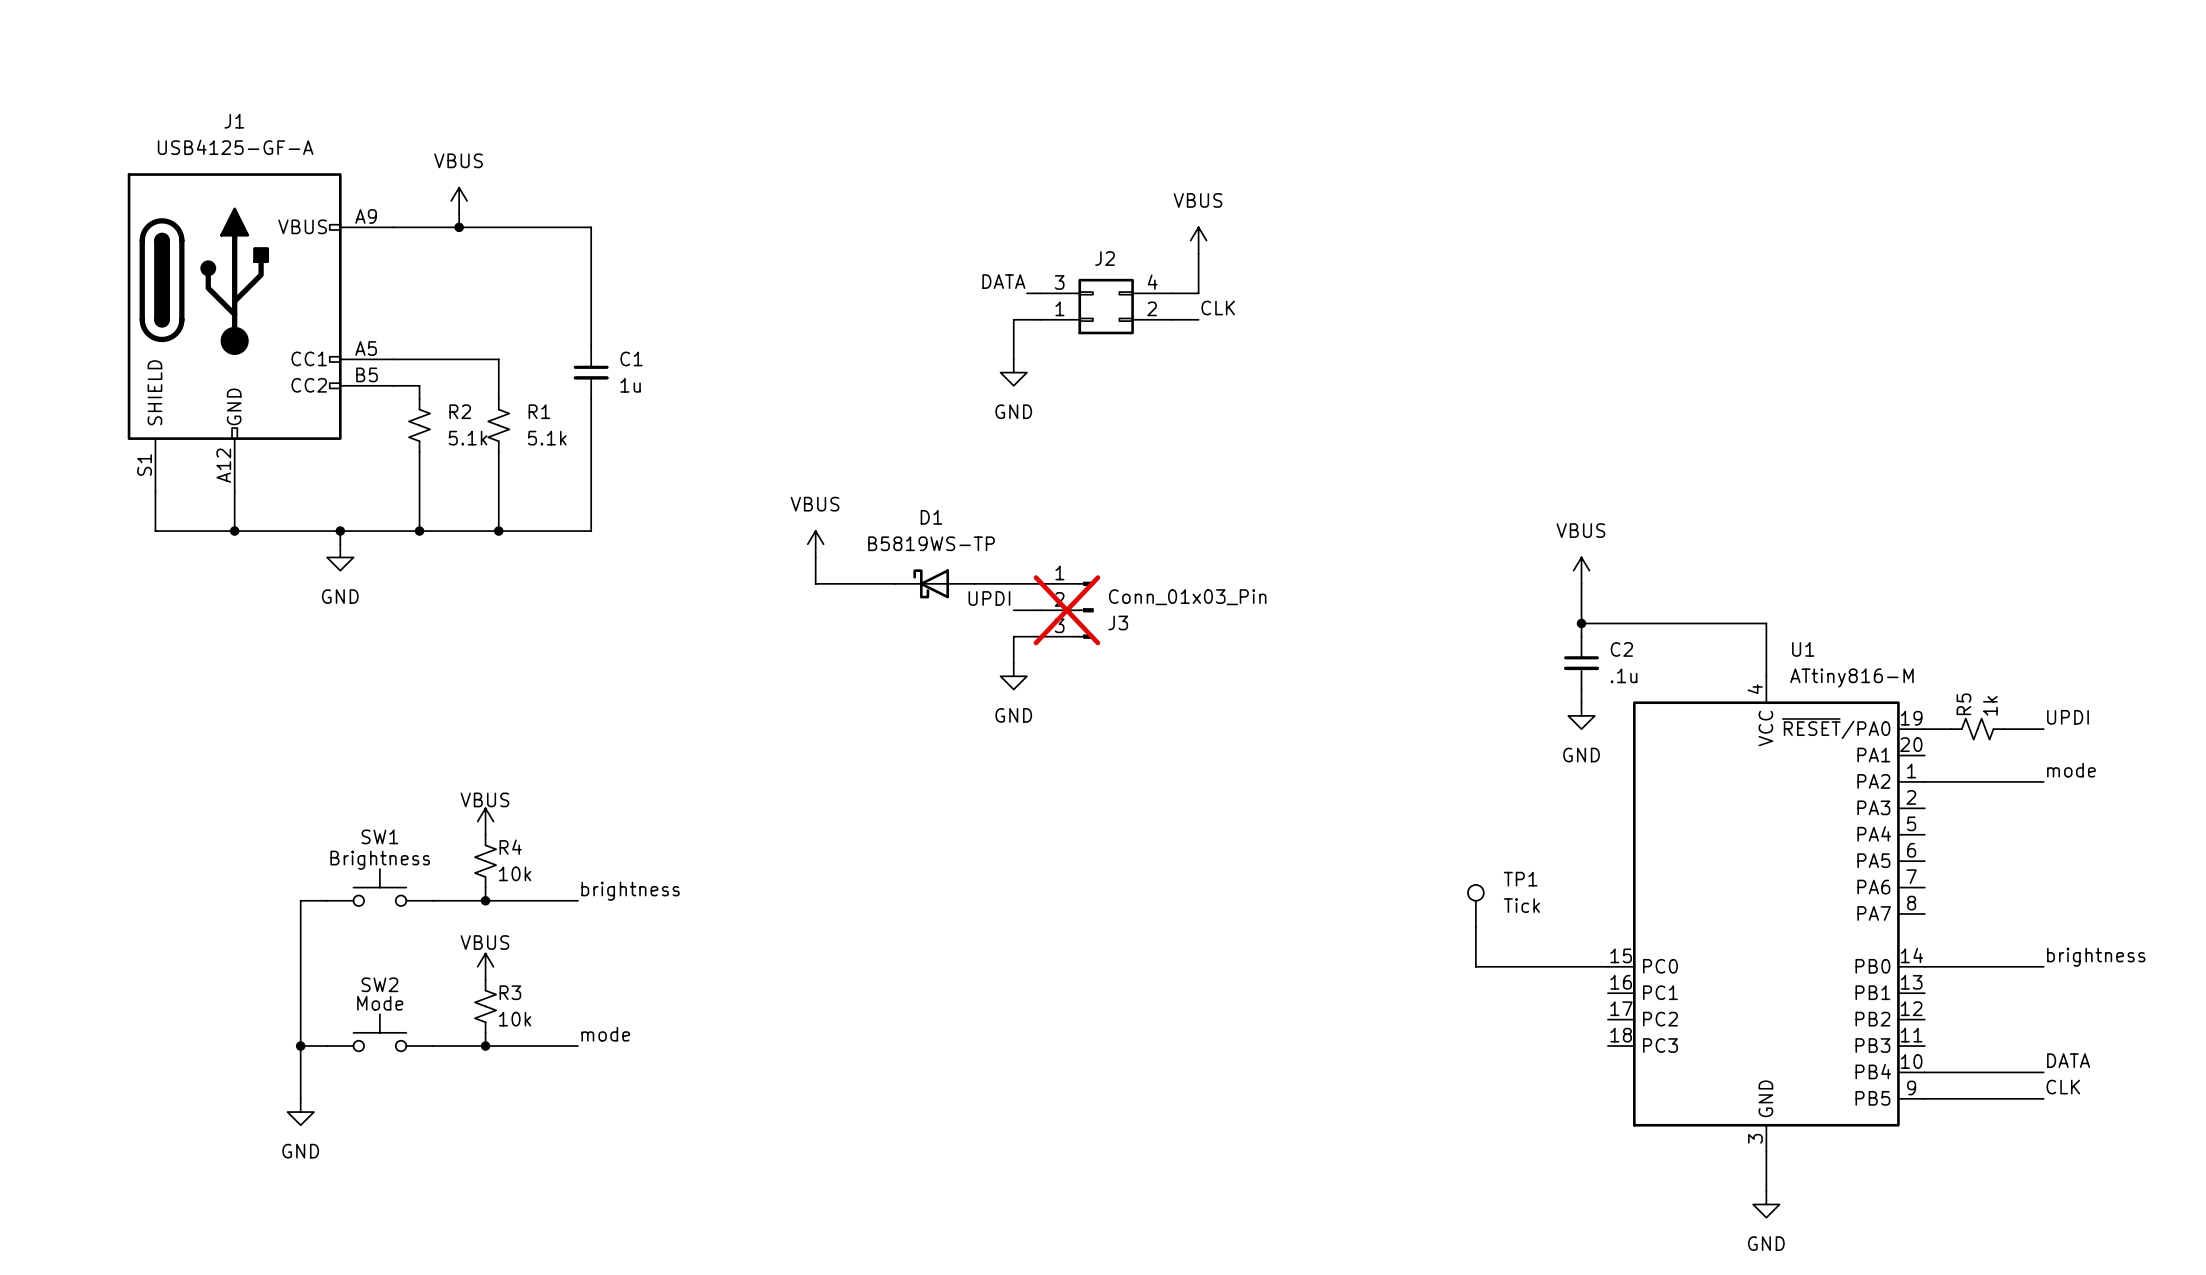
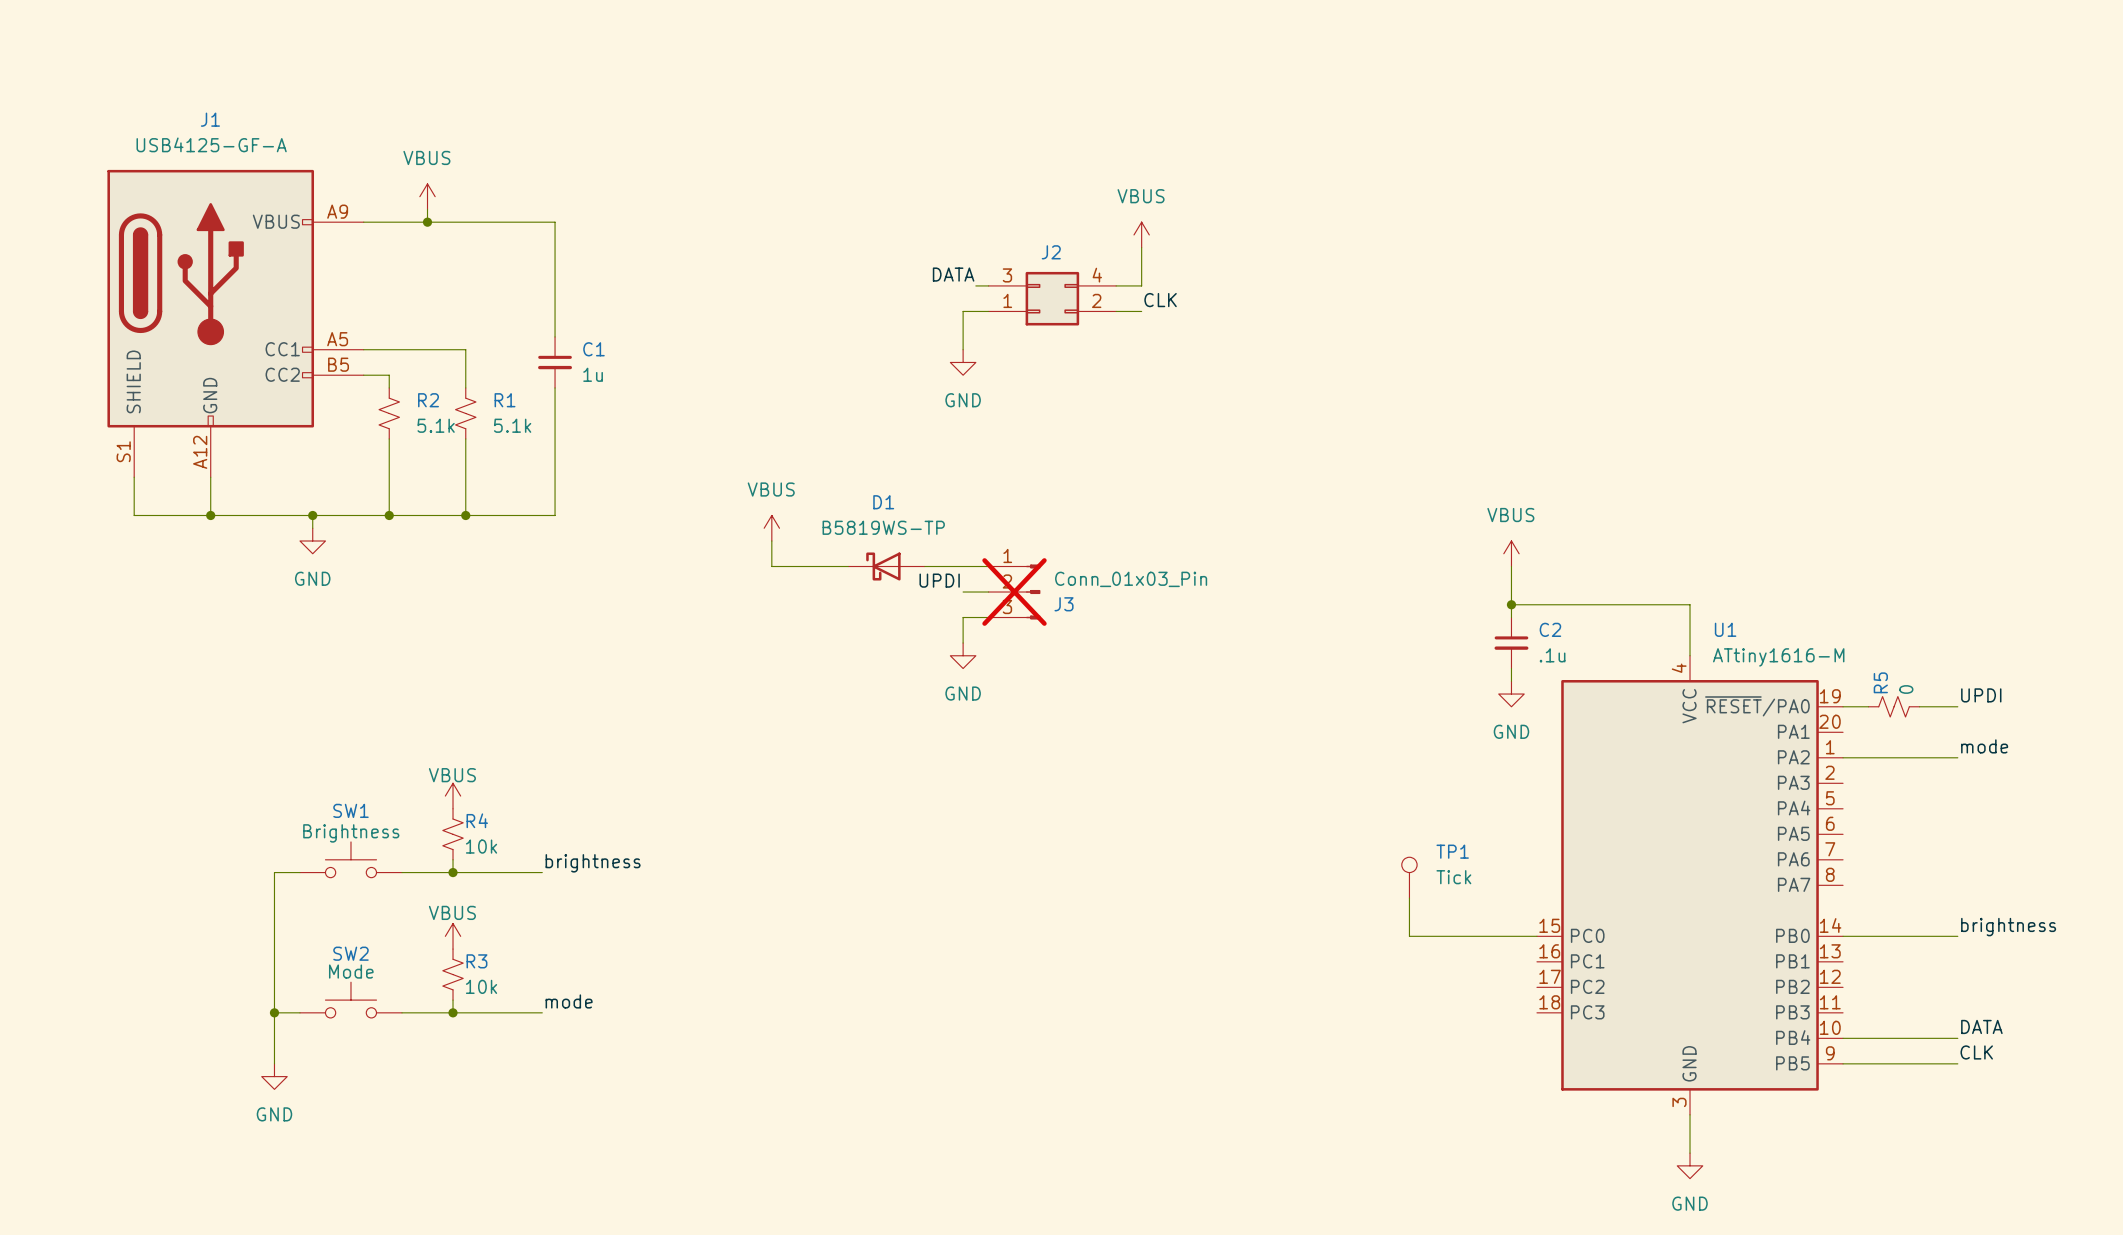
U1 value: ATtiny816-M (1851, 678) -> ATtiny1616-M (1778, 657)
R5 value: 1k (1990, 705) -> 0 (1906, 689)

